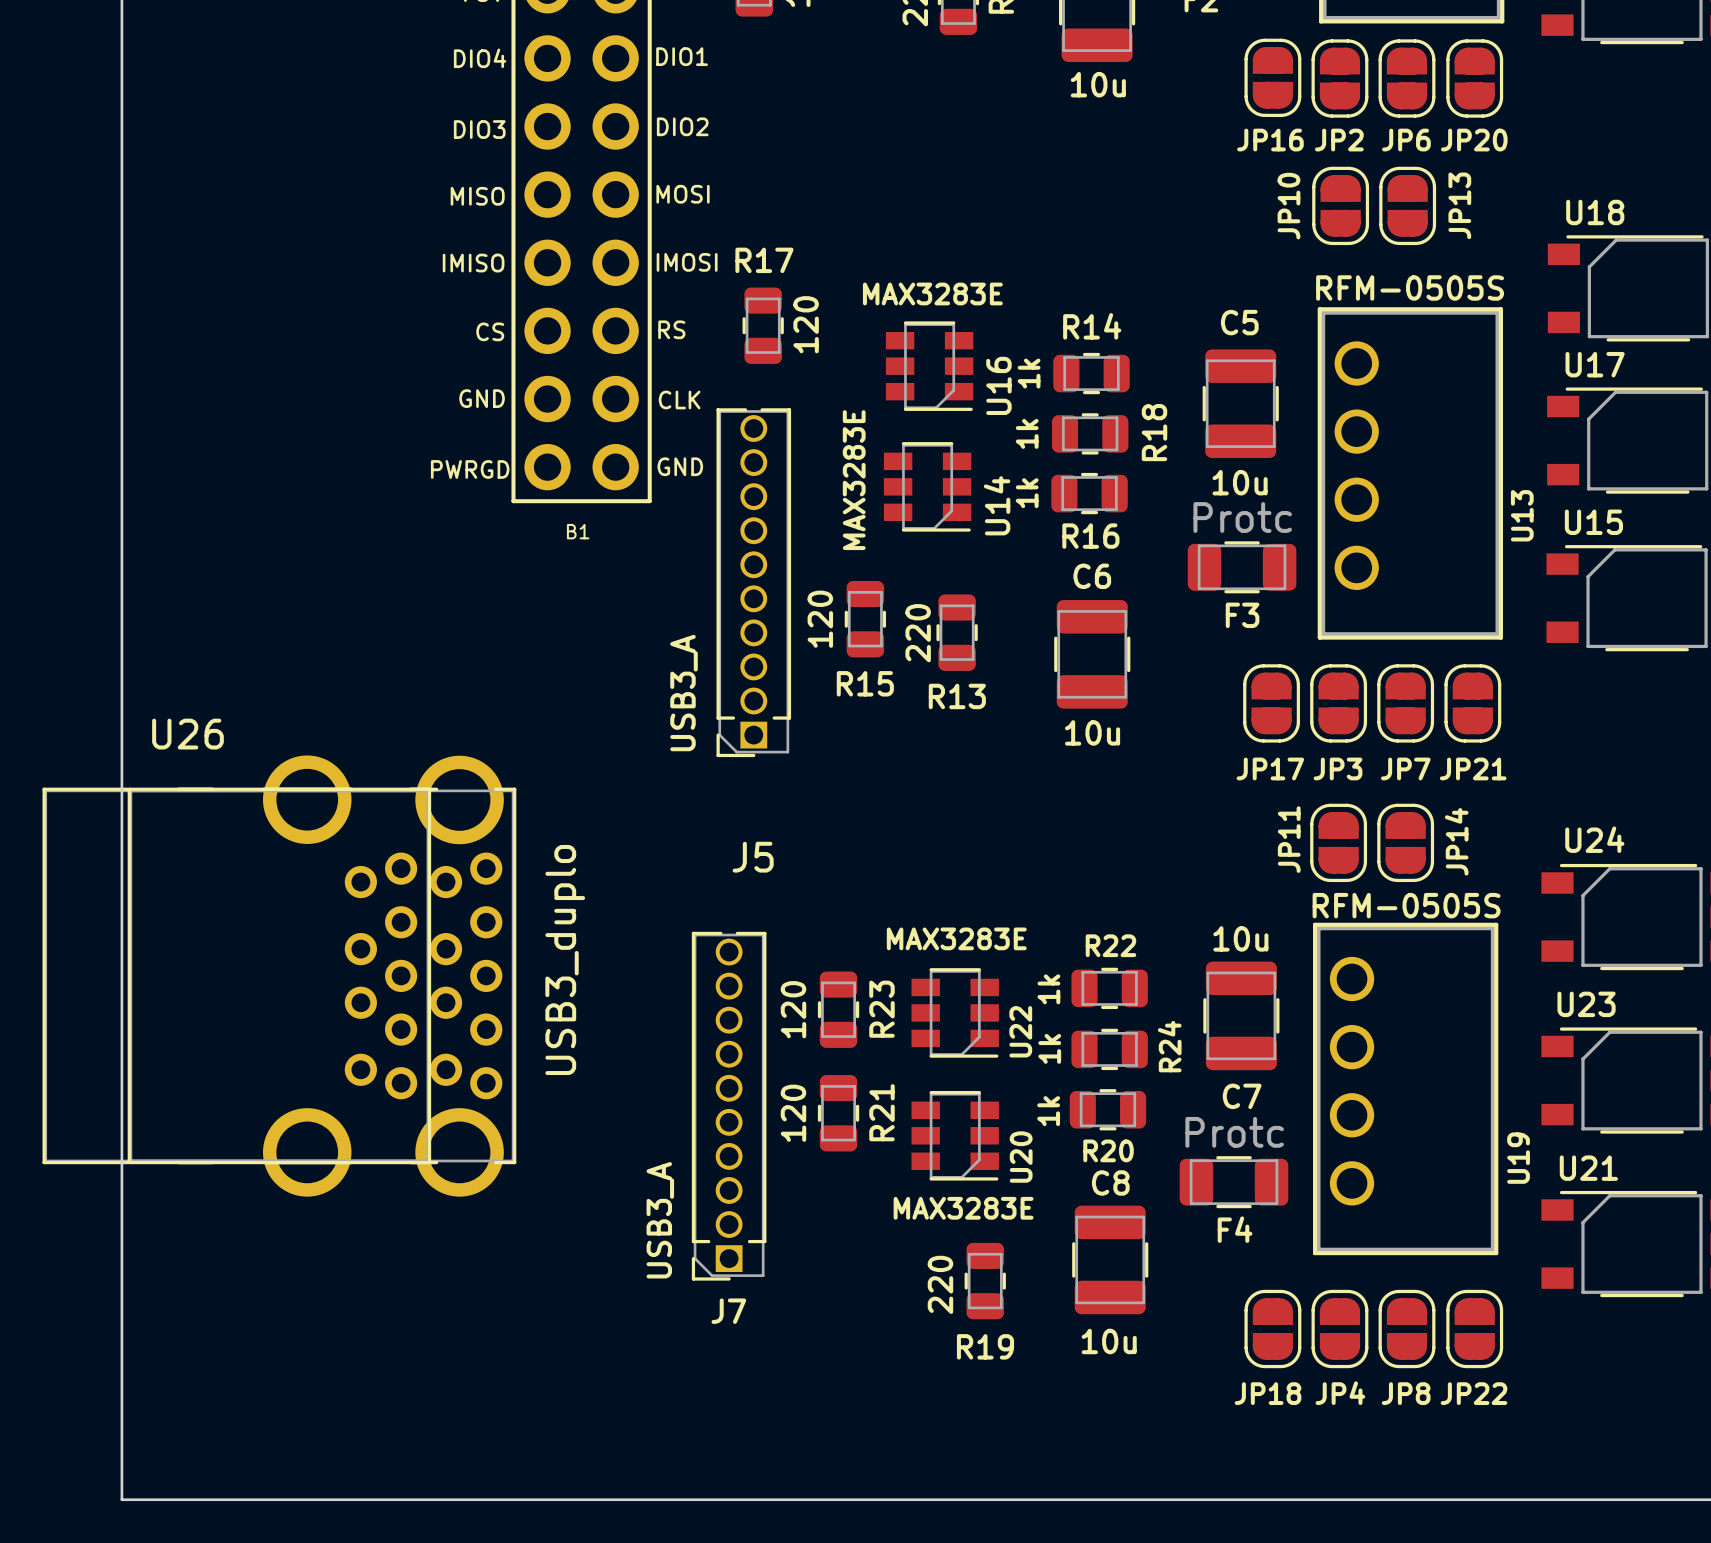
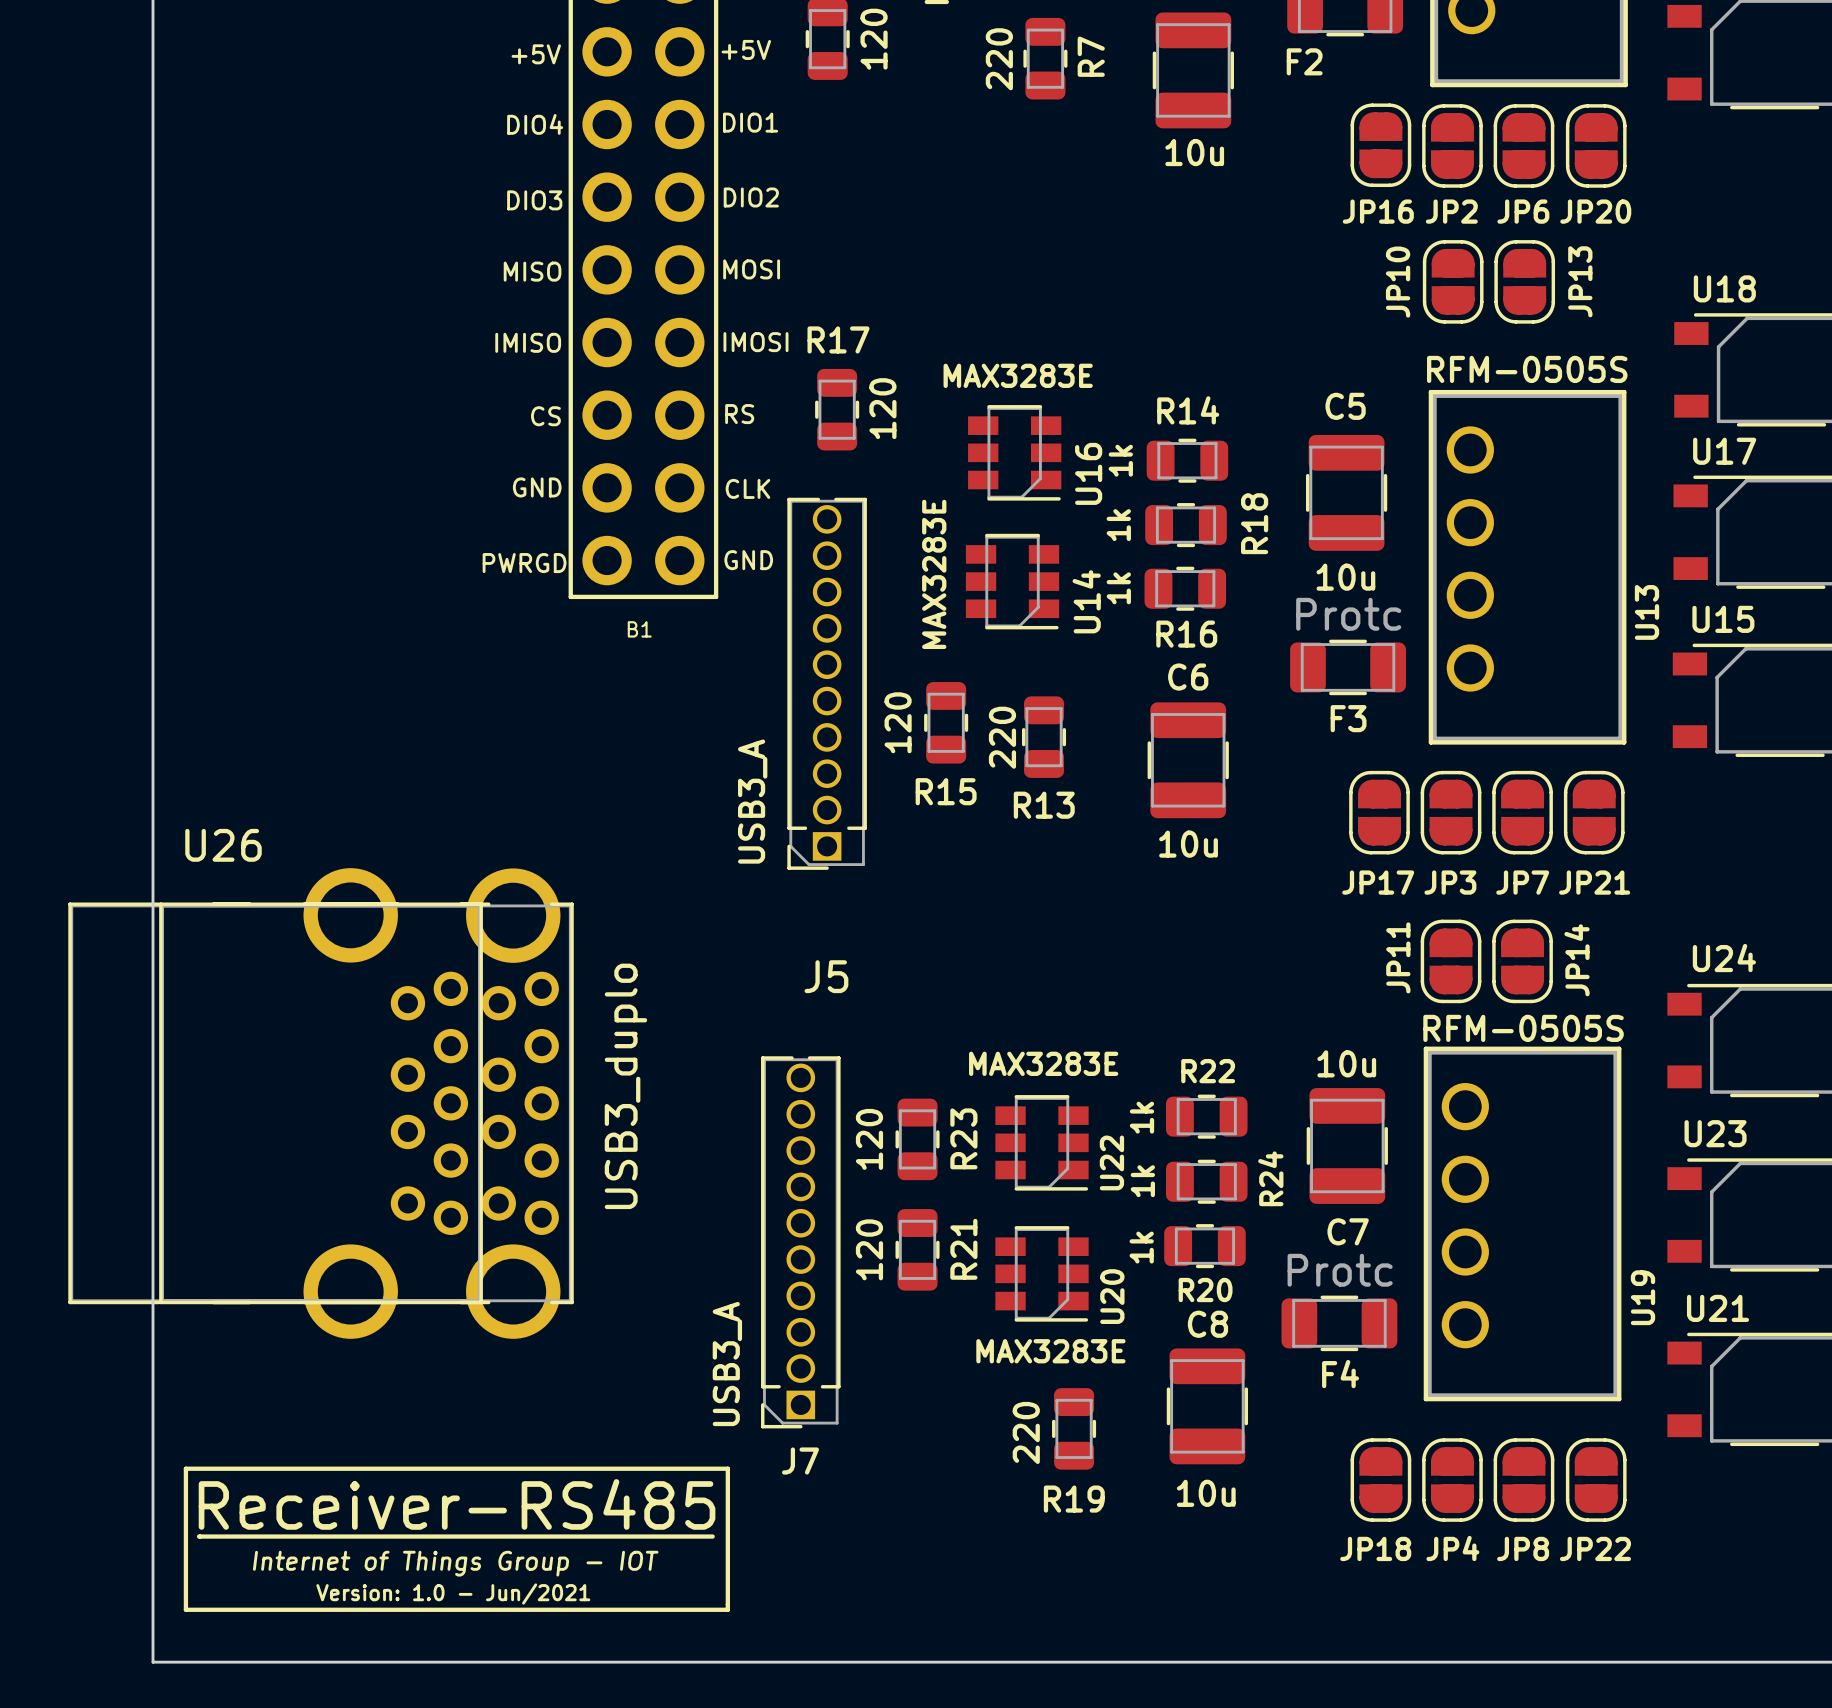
line: none -> (185, 1468) (185, 1609) (727, 1609) (727, 1468) (185, 1468)
text: none -> Receiver-RS485 (457, 1504)
line: none -> (199, 1536) (712, 1536)
text: none -> Internet of Things Group - IOT (455, 1563)
text: none -> Version: 1.0 - Jun/2021 (453, 1594)

